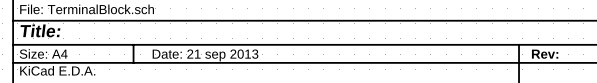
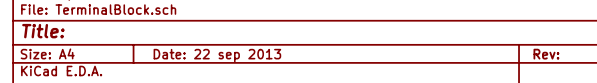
title block: Date: 21 sep 2013 (205, 55) -> Date: 22 sep 2013 (217, 55)

